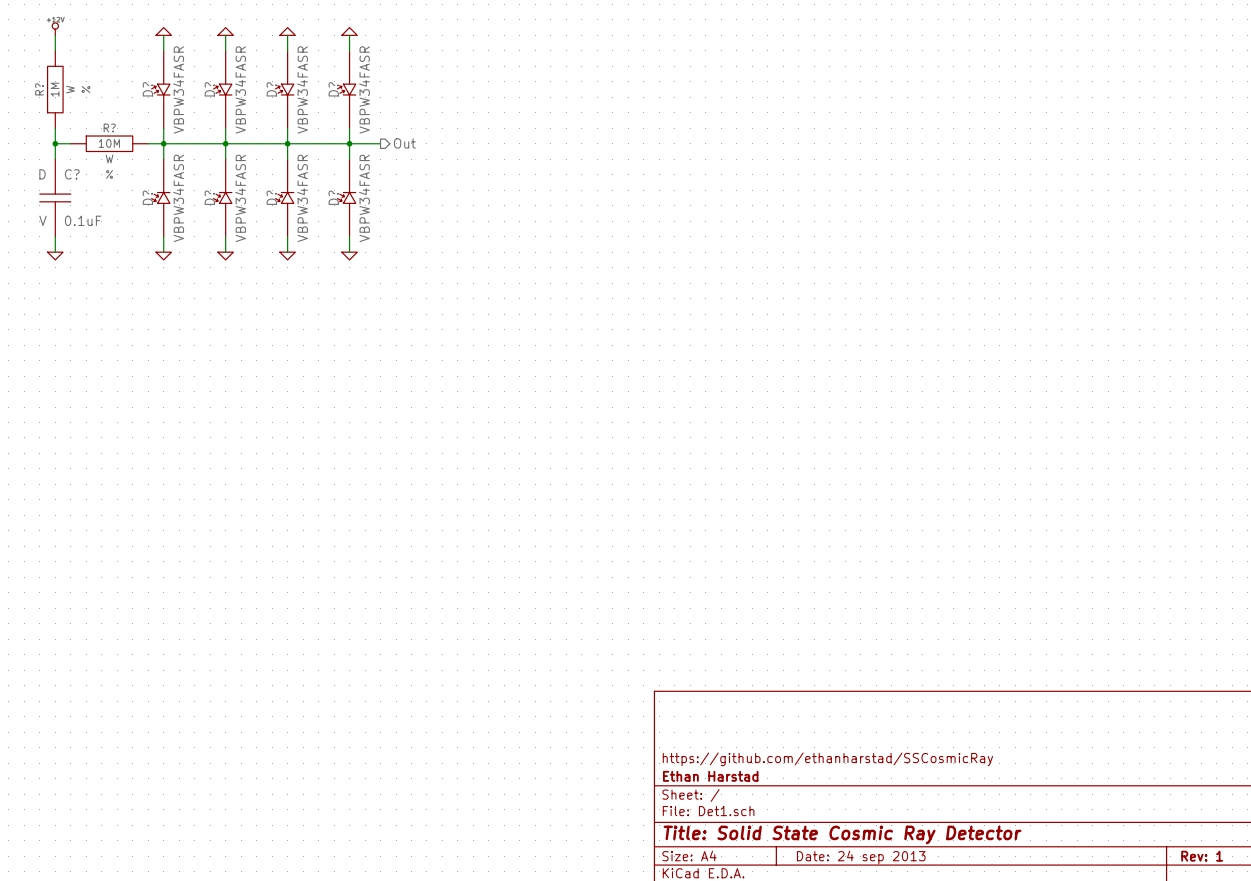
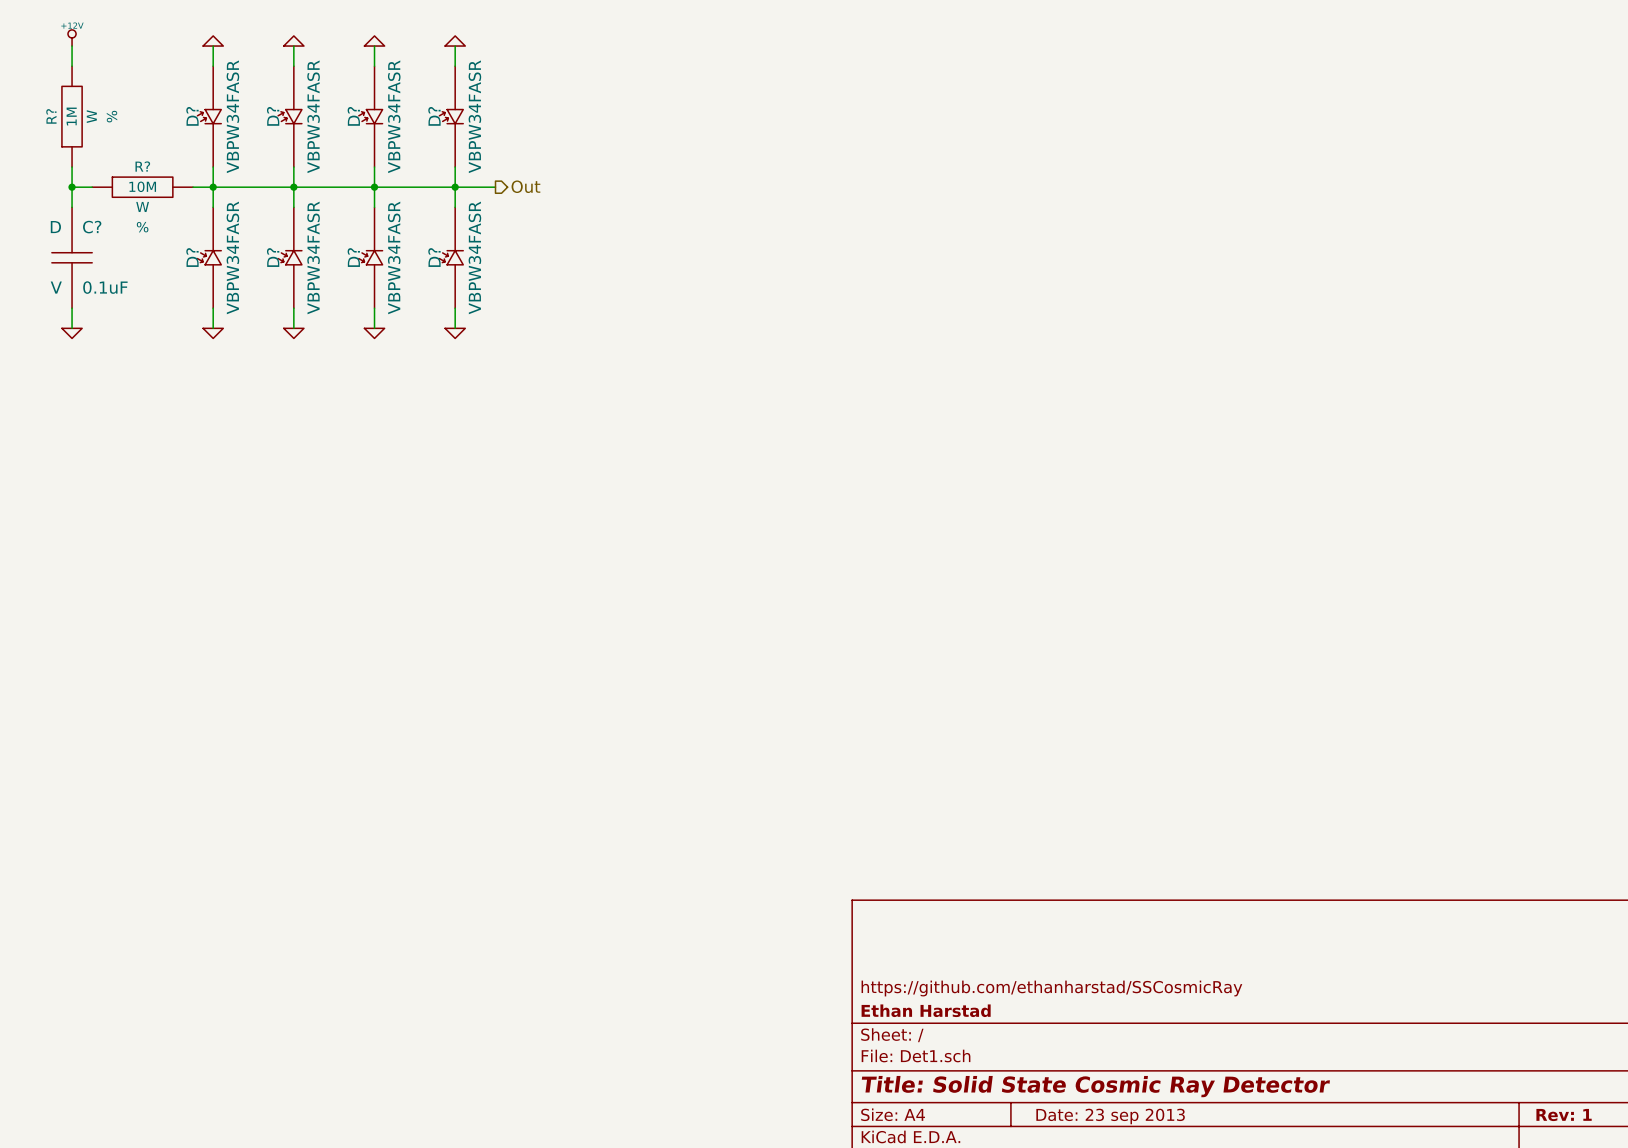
title block: Date: 24 sep 2013 (861, 857) -> Date: 23 sep 2013 (1110, 1116)

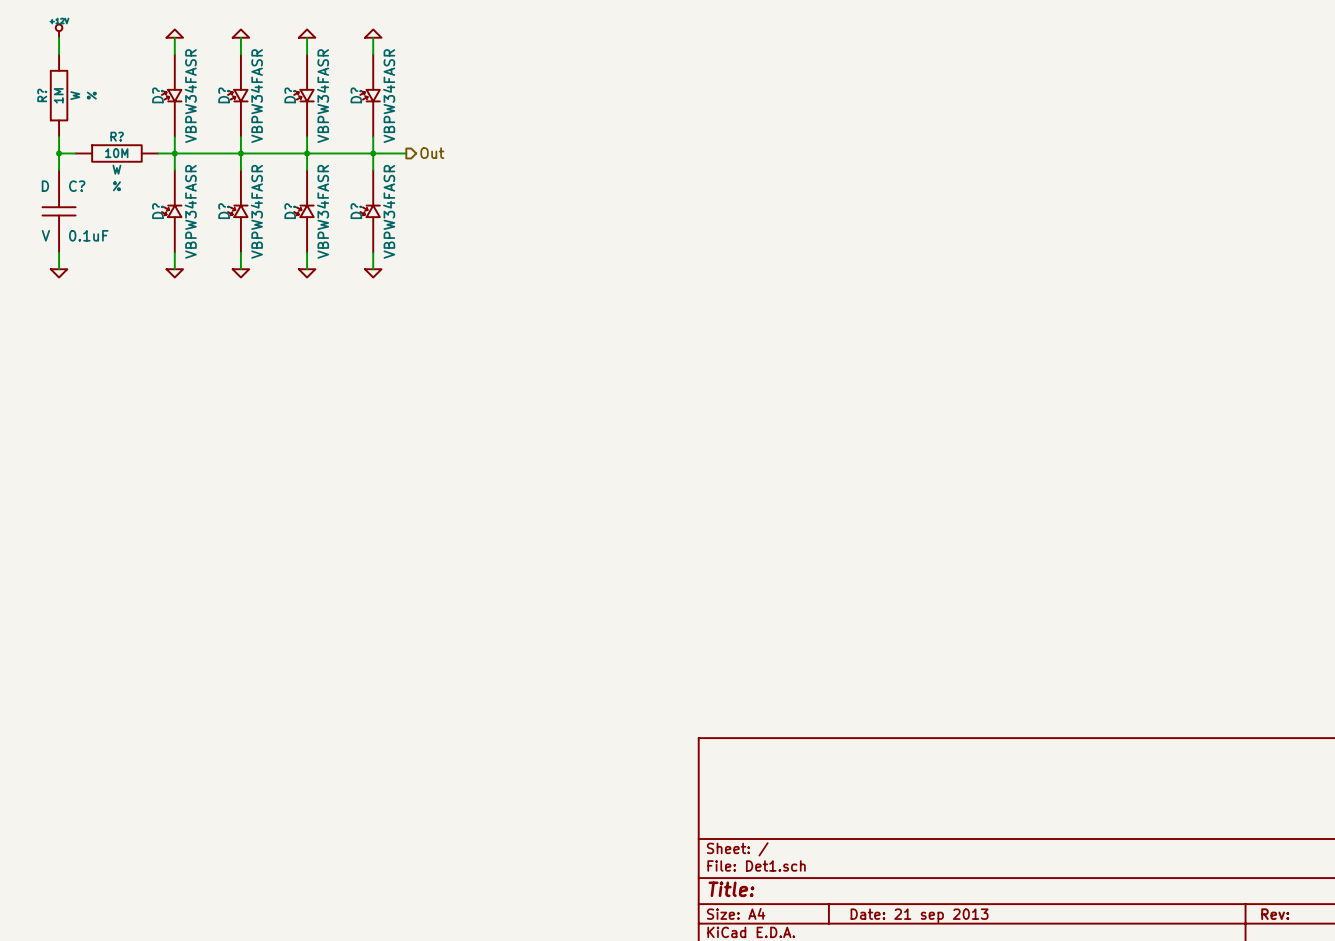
title block: https://github.com/ethanharstad/SSCosmicRay (1051, 988) -> none
title block: Ethan Harstad (926, 1010) -> none
title block: Title: Solid State Cosmic Ray Detector (1095, 1086) -> Title: (731, 889)
title block: Rev: 1 (1564, 1115) -> Rev: (1275, 914)
title block: Date: 23 sep 2013 (1110, 1116) -> Date: 21 sep 2013 (919, 915)

